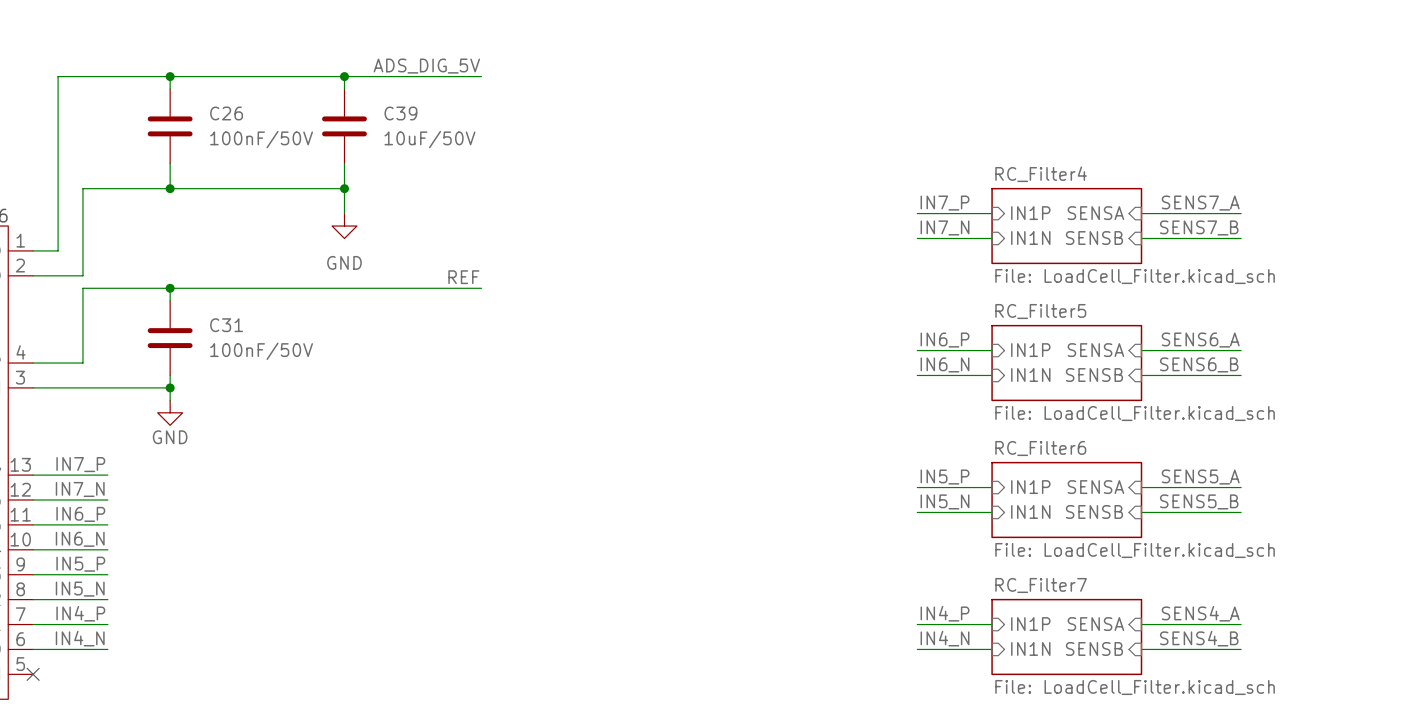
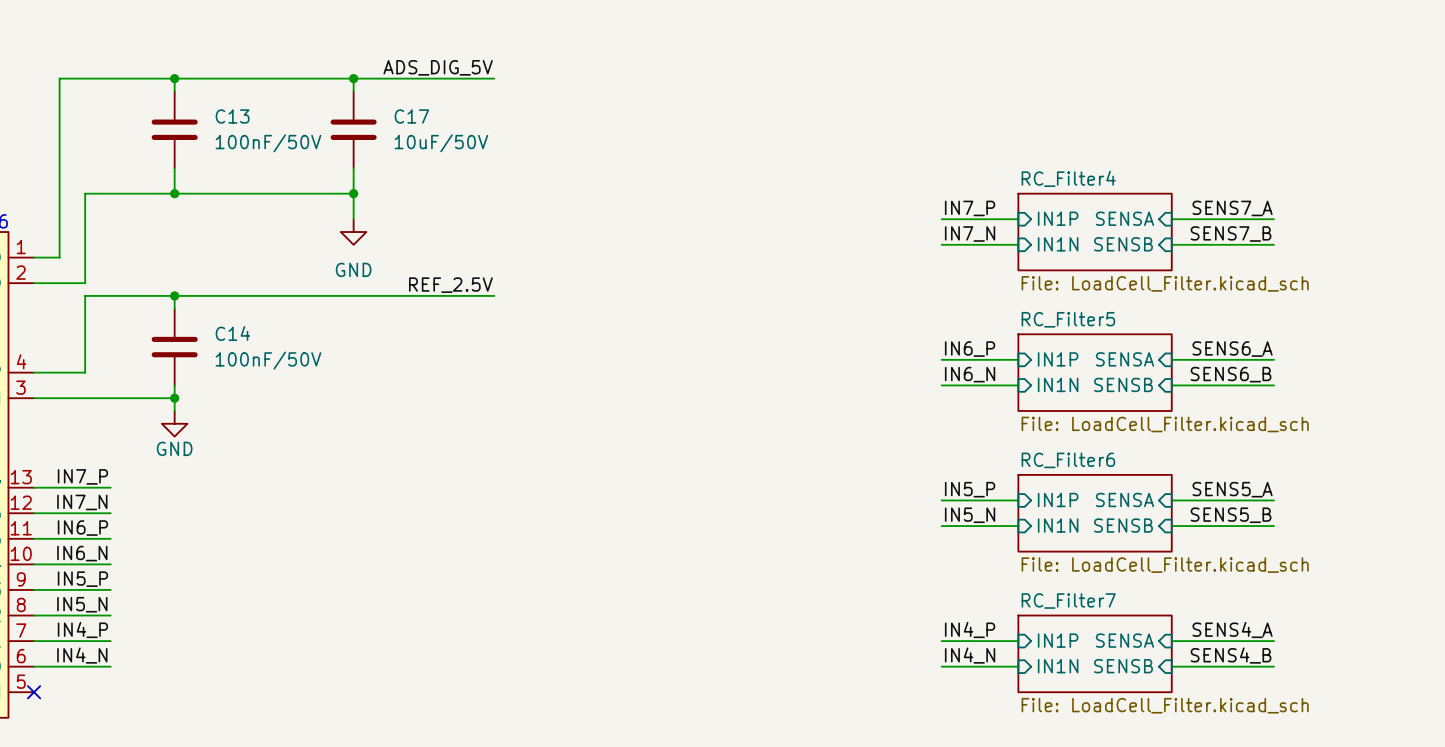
C26 name: C26 (226, 113) -> C13 (232, 116)
C39 name: C39 (400, 113) -> C17 (411, 116)
label: REF (463, 277) -> REF_2.5V (450, 285)
C31 name: C31 (226, 325) -> C14 (232, 333)

